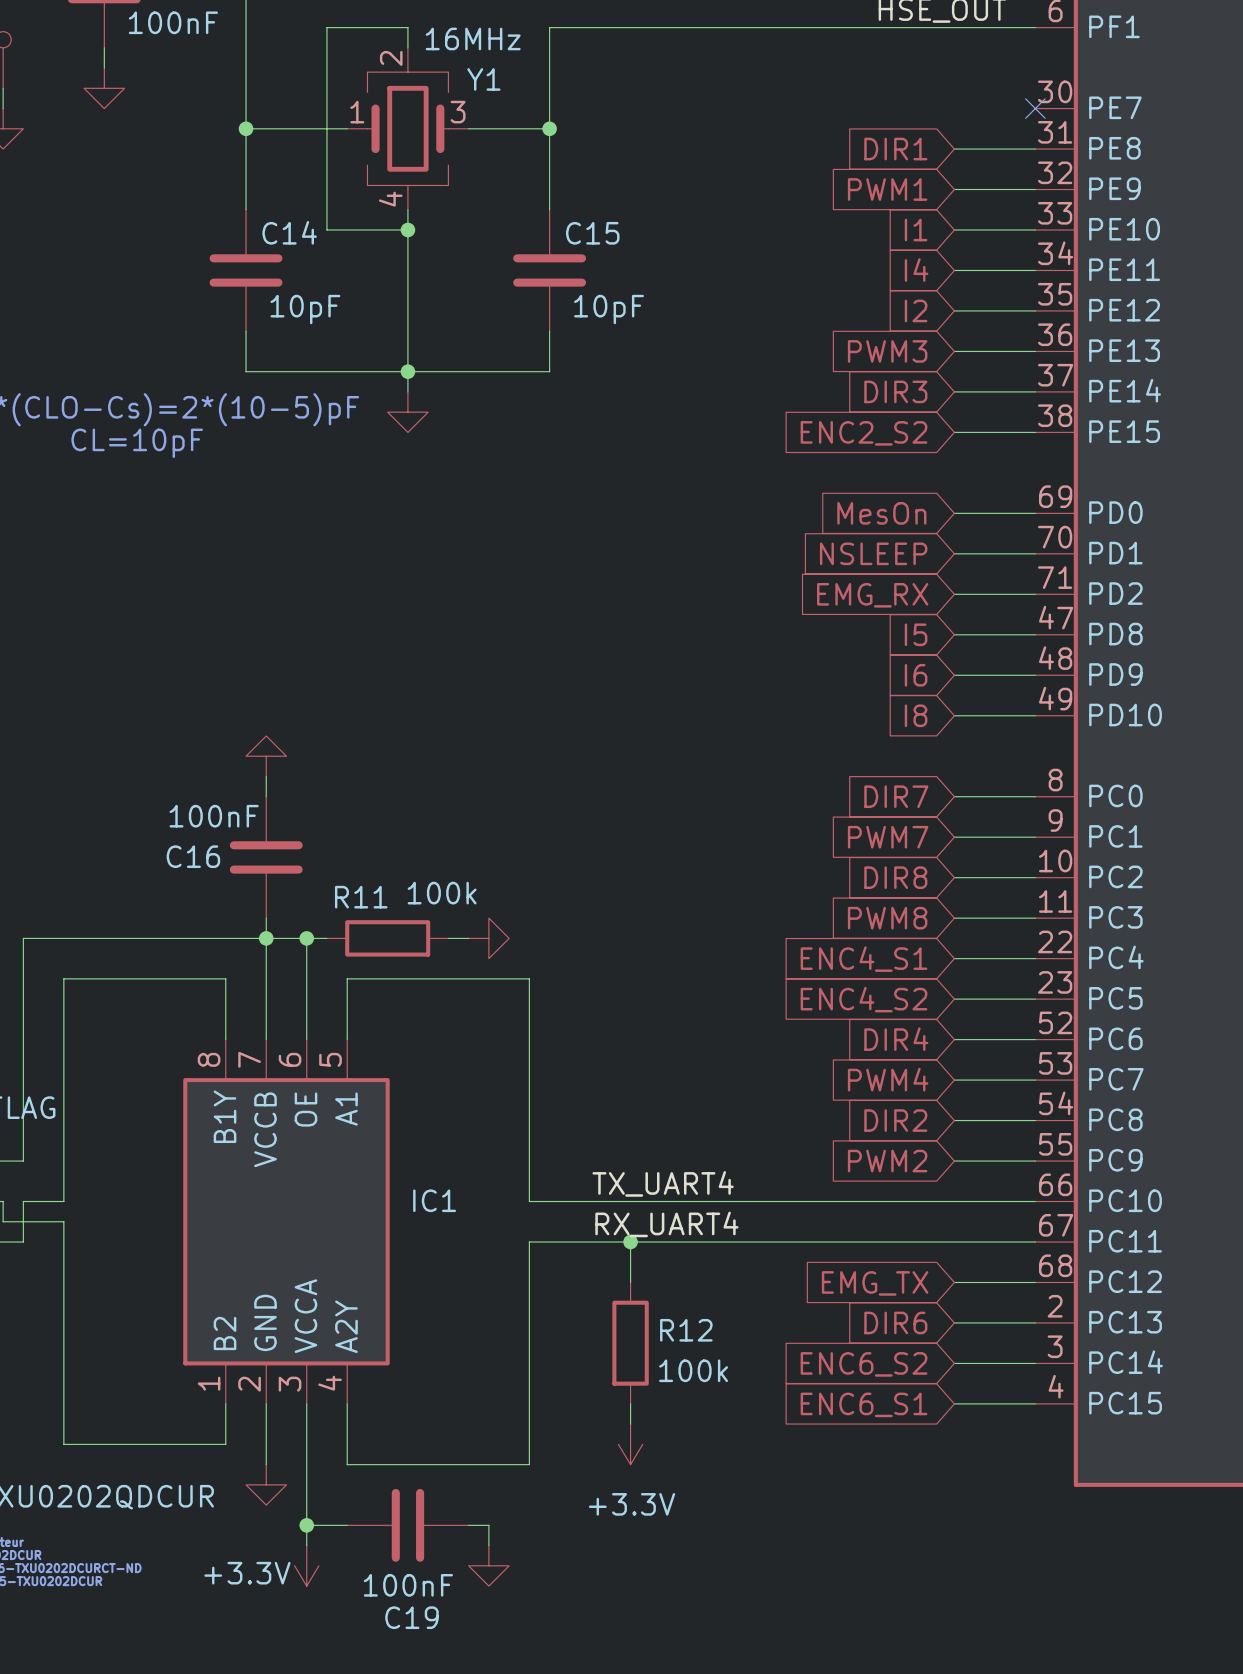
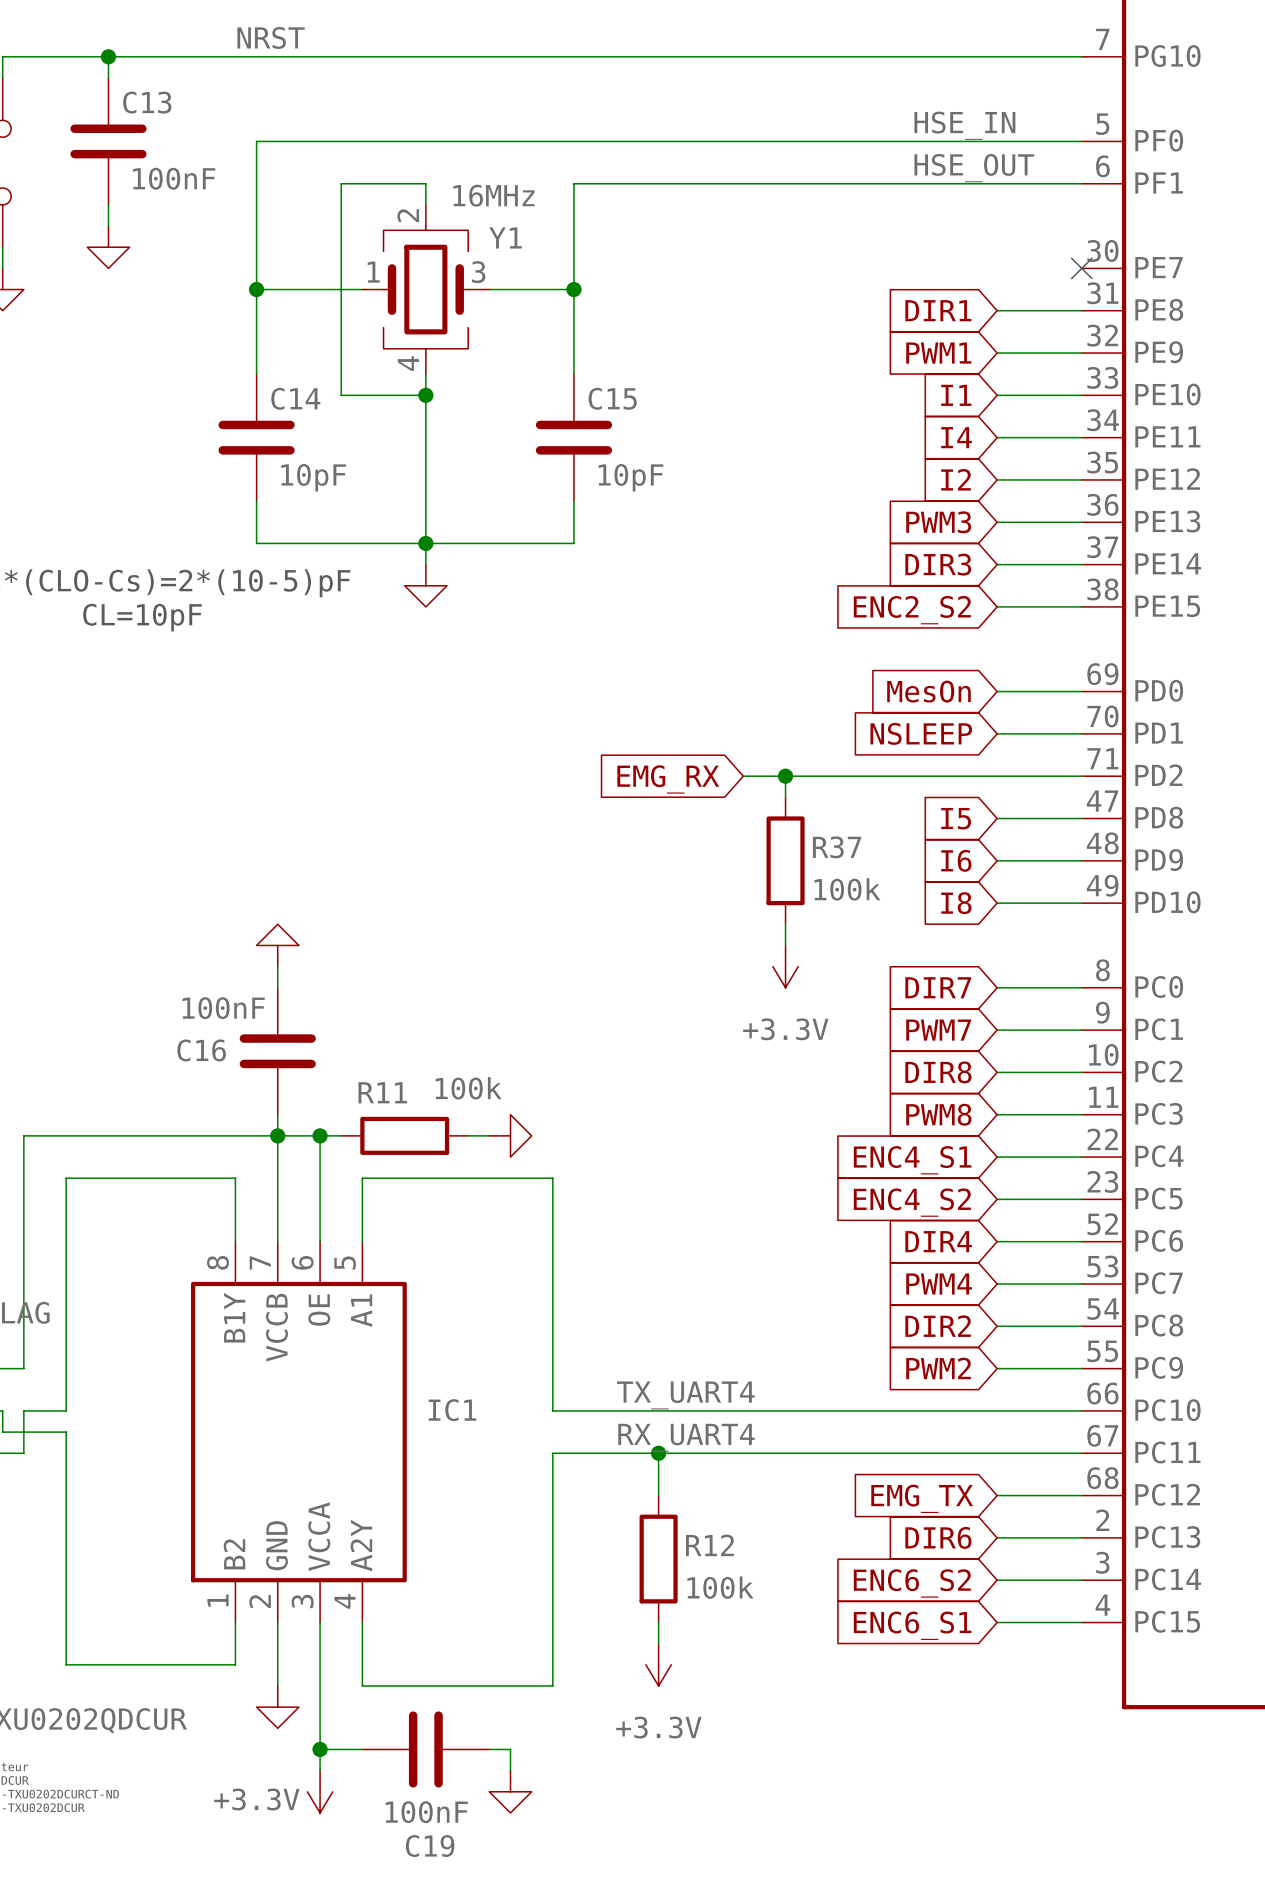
wire: none -> (743, 776) (997, 776)
wire: none -> (785, 776) (785, 797)
junction: none -> (785, 776)
global label position: EMG_RX (872, 595) -> EMG_RX (668, 779)
R37: none -> 100k (785, 860)
wire: none -> (785, 924) (785, 945)
power symbol: none -> +3.3V (785, 966)

